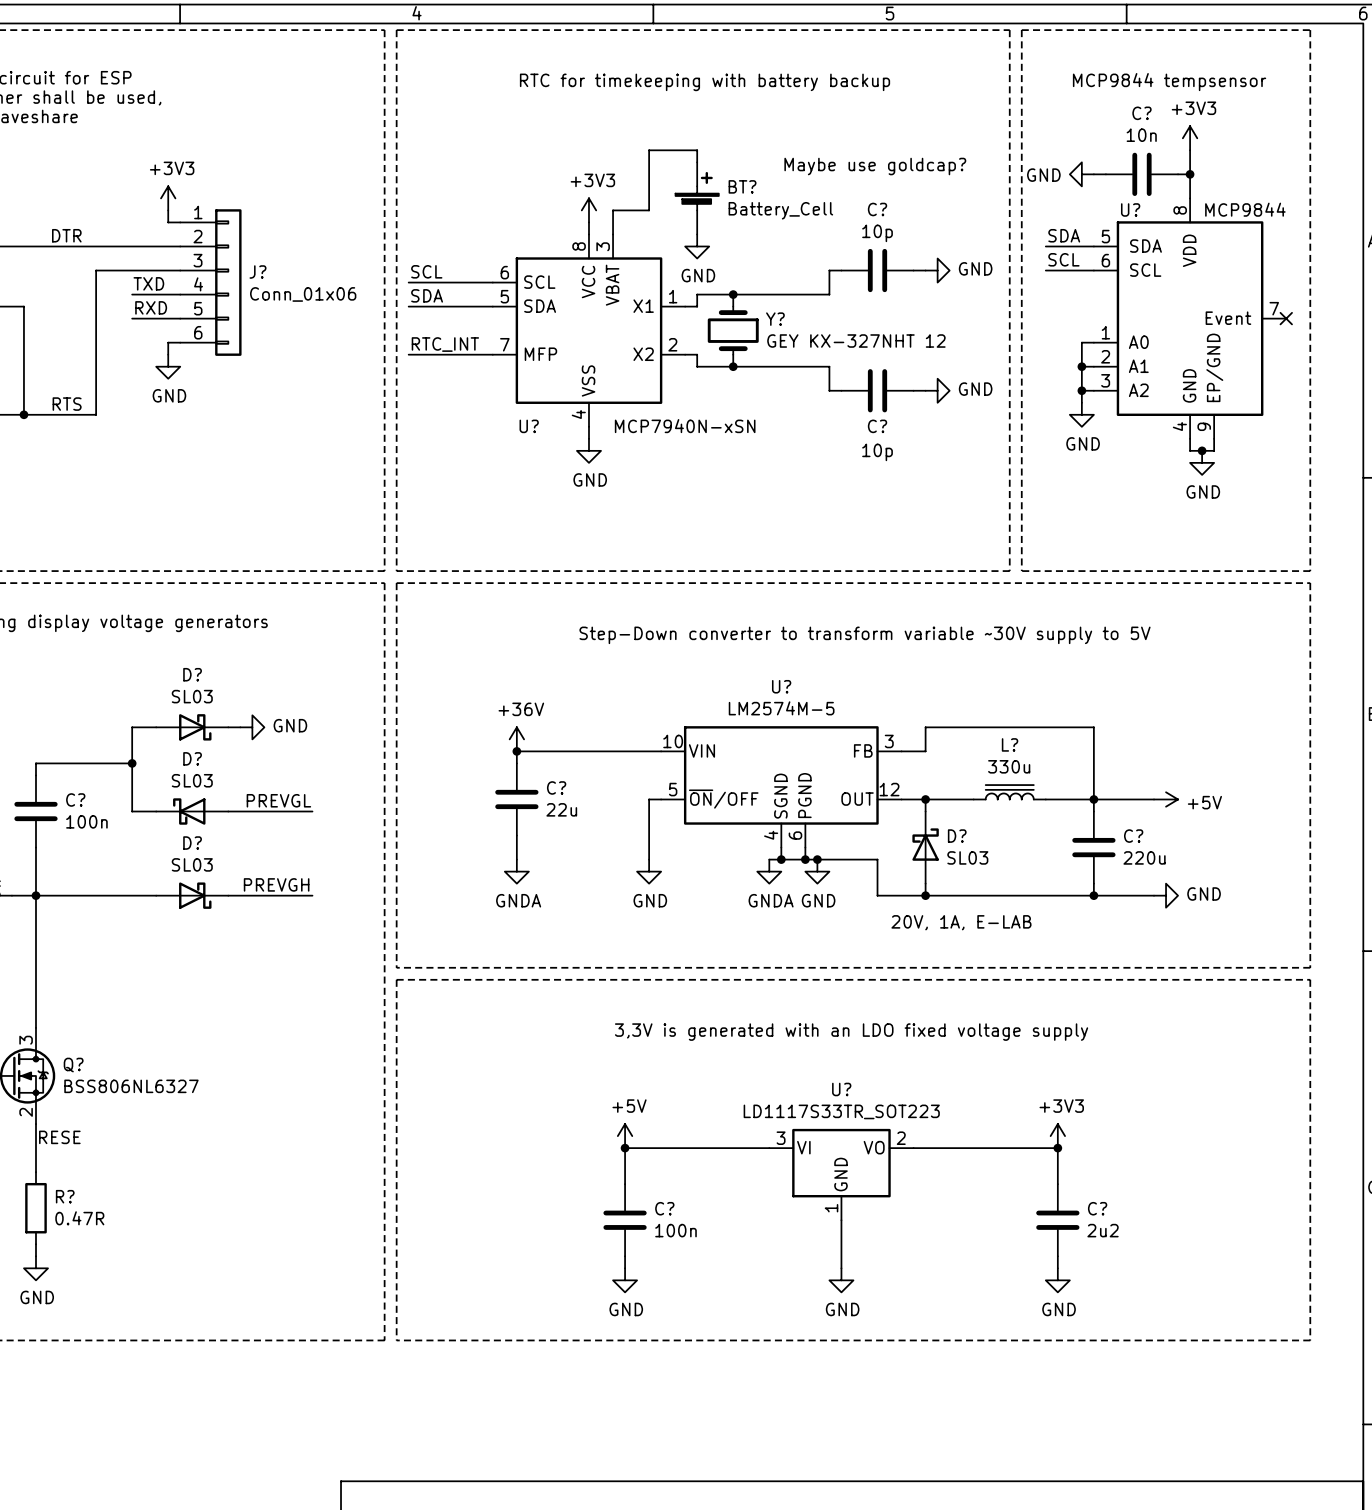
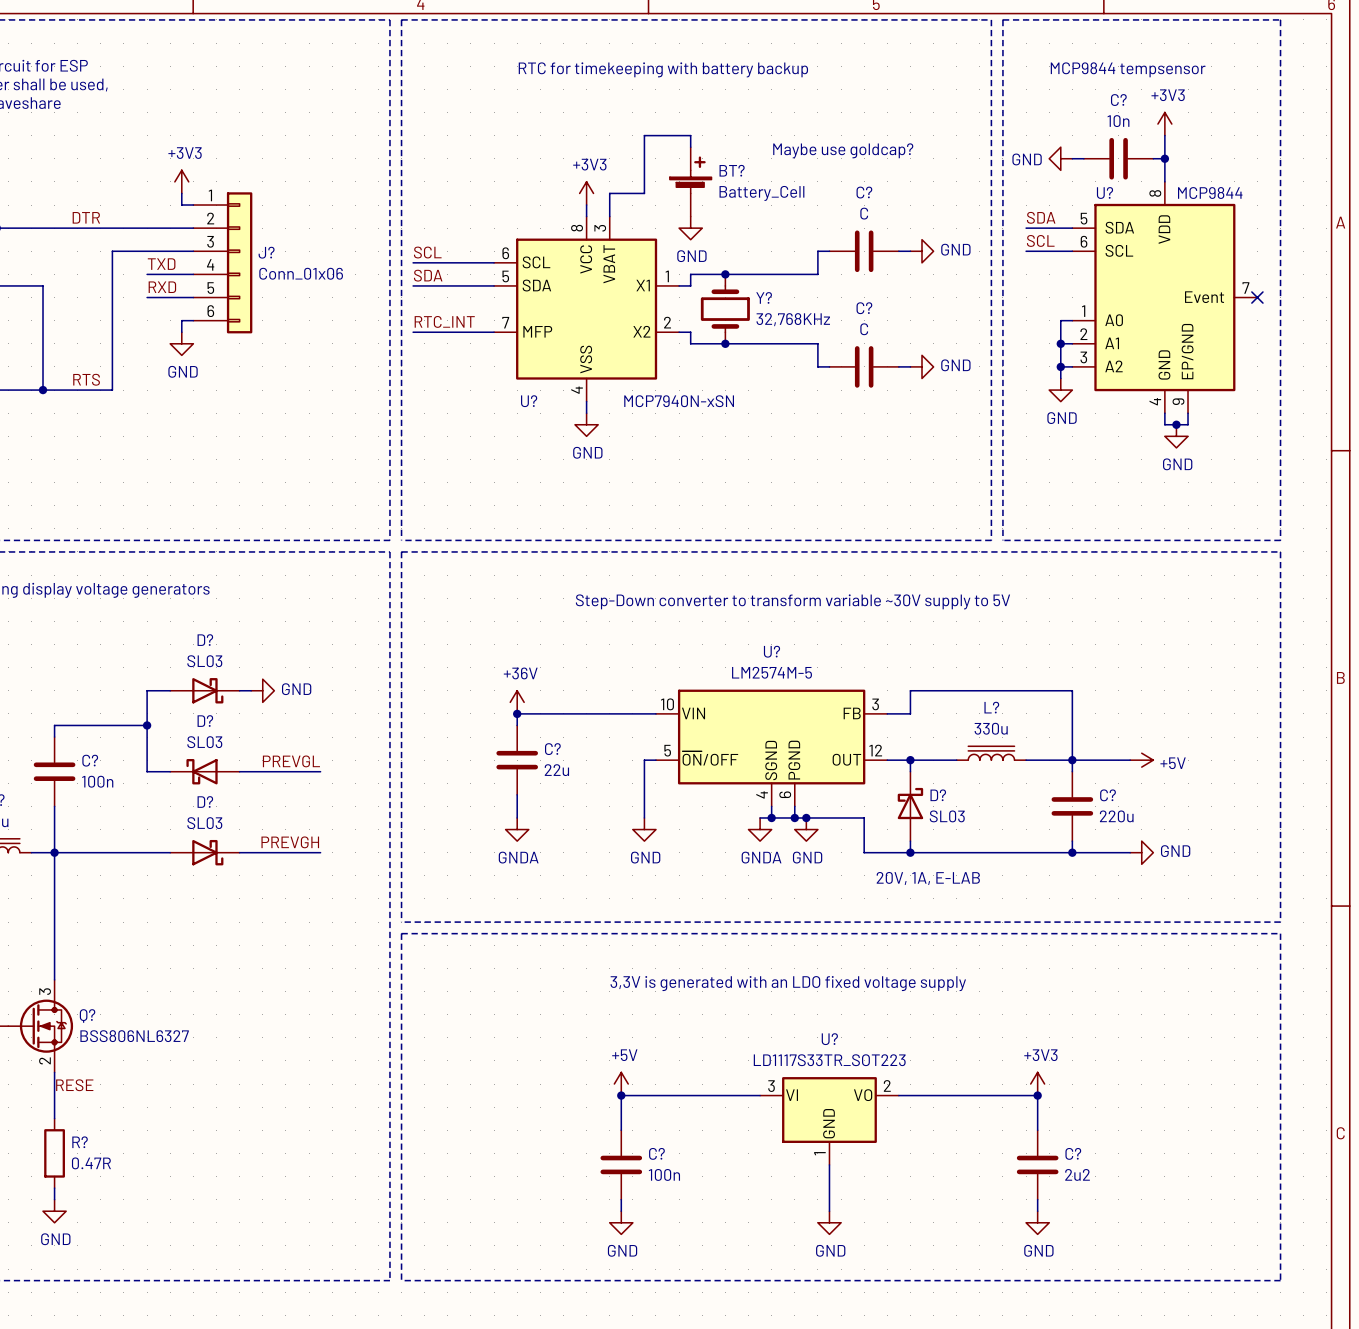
C? value: 10p (877, 233) -> C (864, 213)
Y? value: GEY KX-327NHT 12 (856, 341) -> 32,768KHz (793, 319)
C? name position: C? (877, 426) -> C? (864, 308)
C? value: 10p (877, 452) -> C (864, 329)

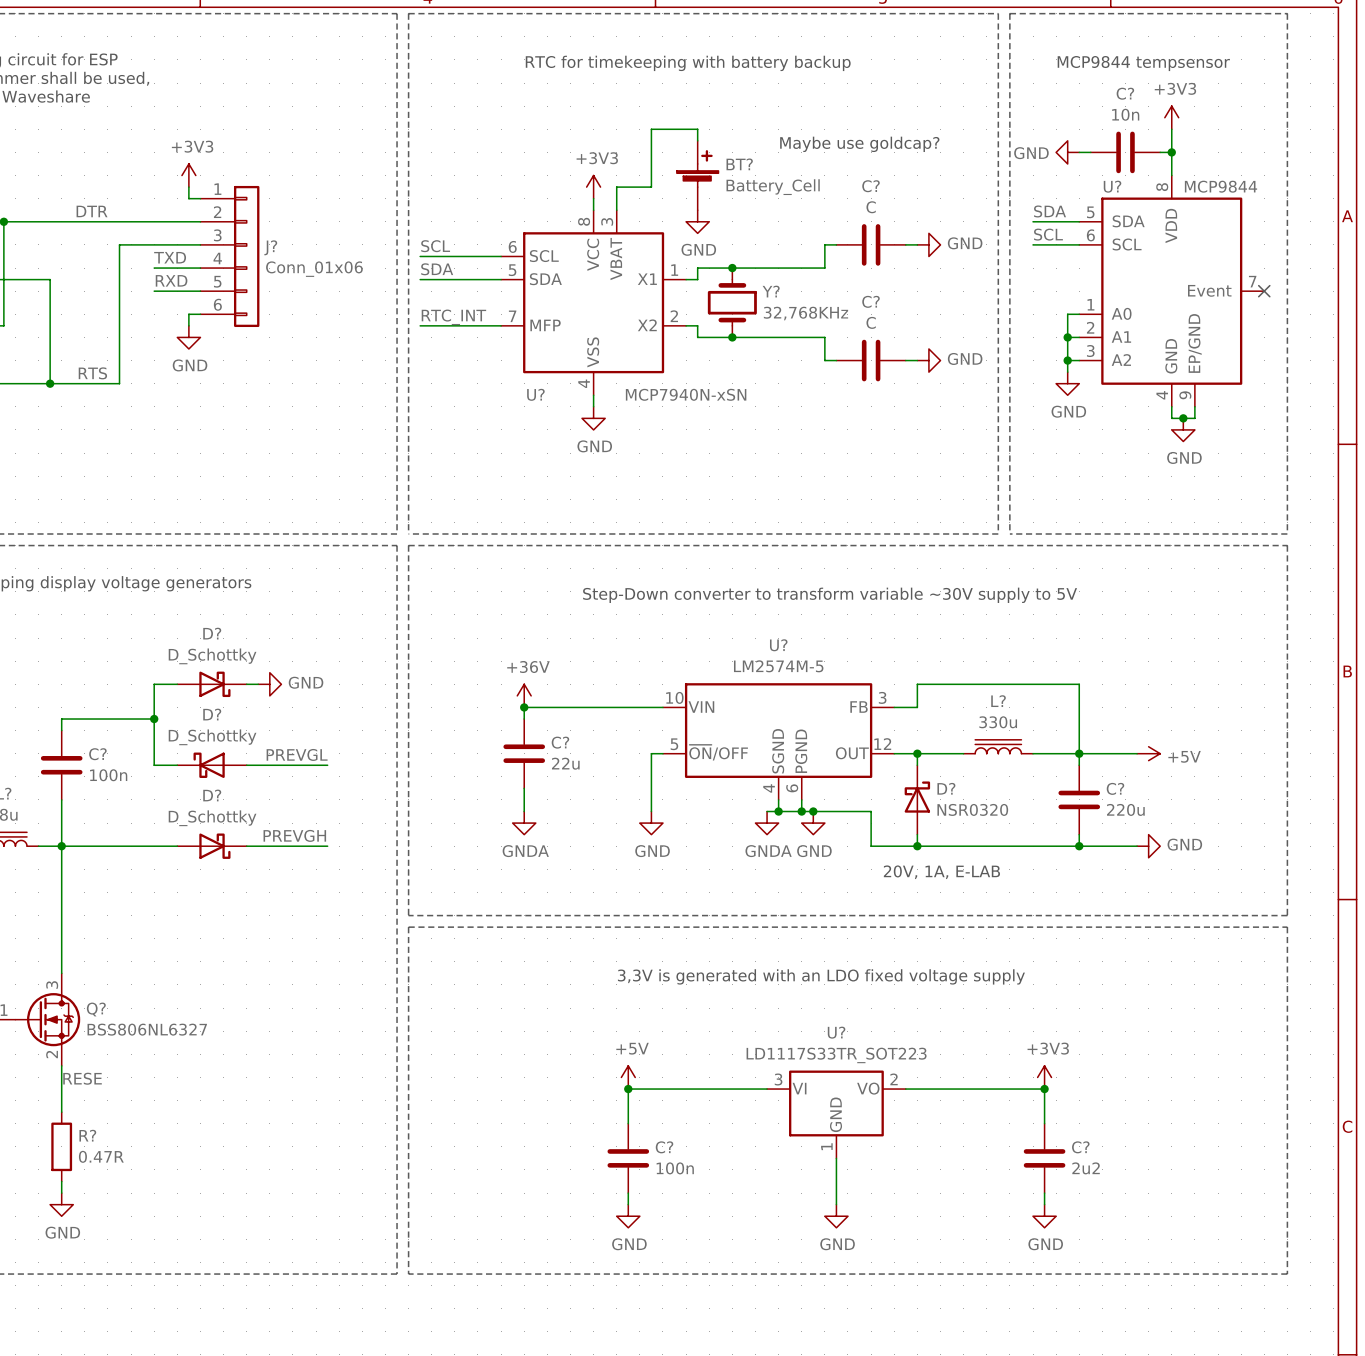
D? value: SL03 (204, 661) -> D_Schottky (212, 656)
D? value: SL03 (204, 742) -> D_Schottky (212, 737)
D? value: SL03 (947, 816) -> NSR0320 (972, 809)
D? value: SL03 (204, 823) -> D_Schottky (212, 818)

